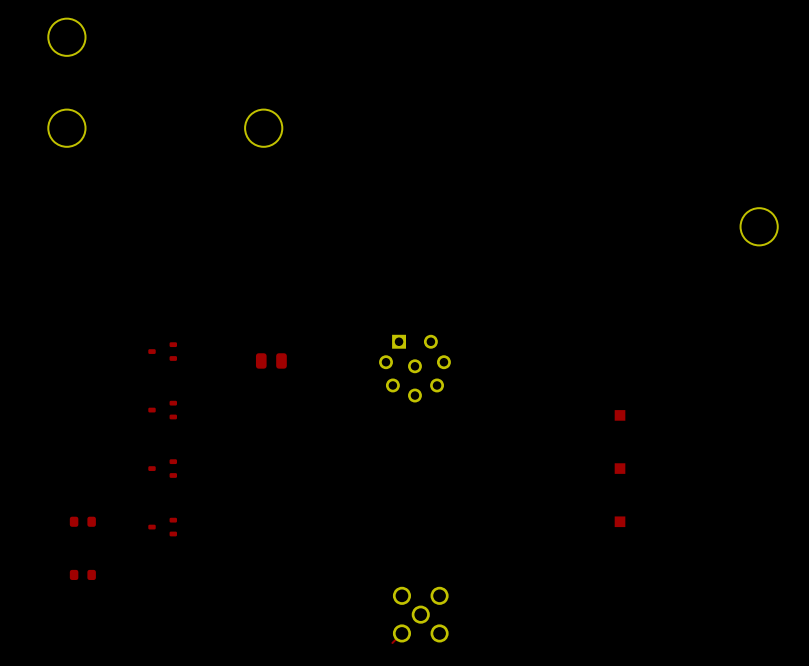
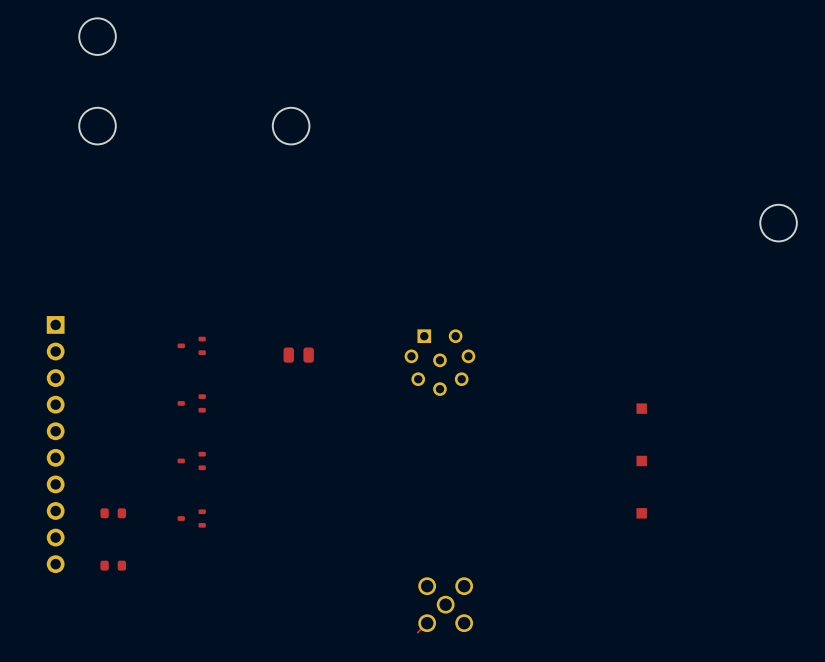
part: none -> (55, 444)

